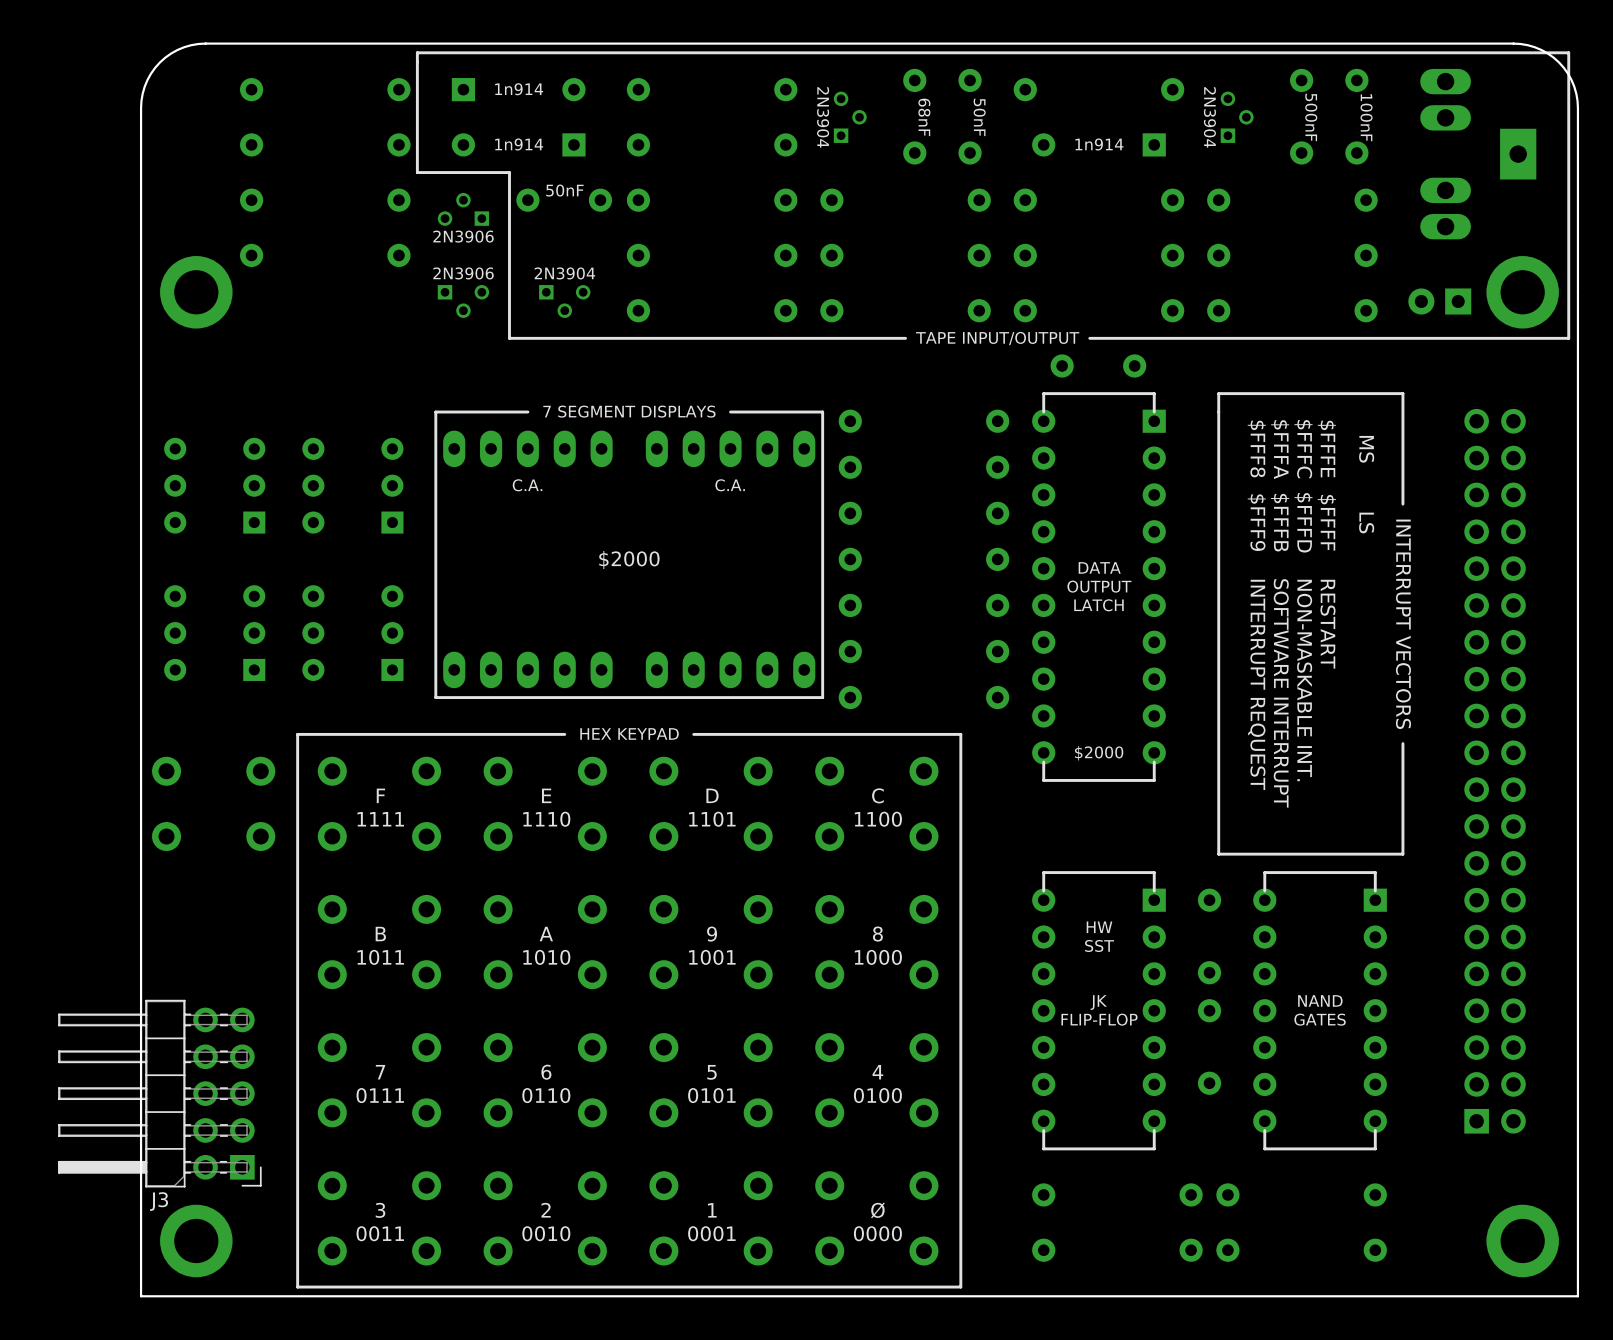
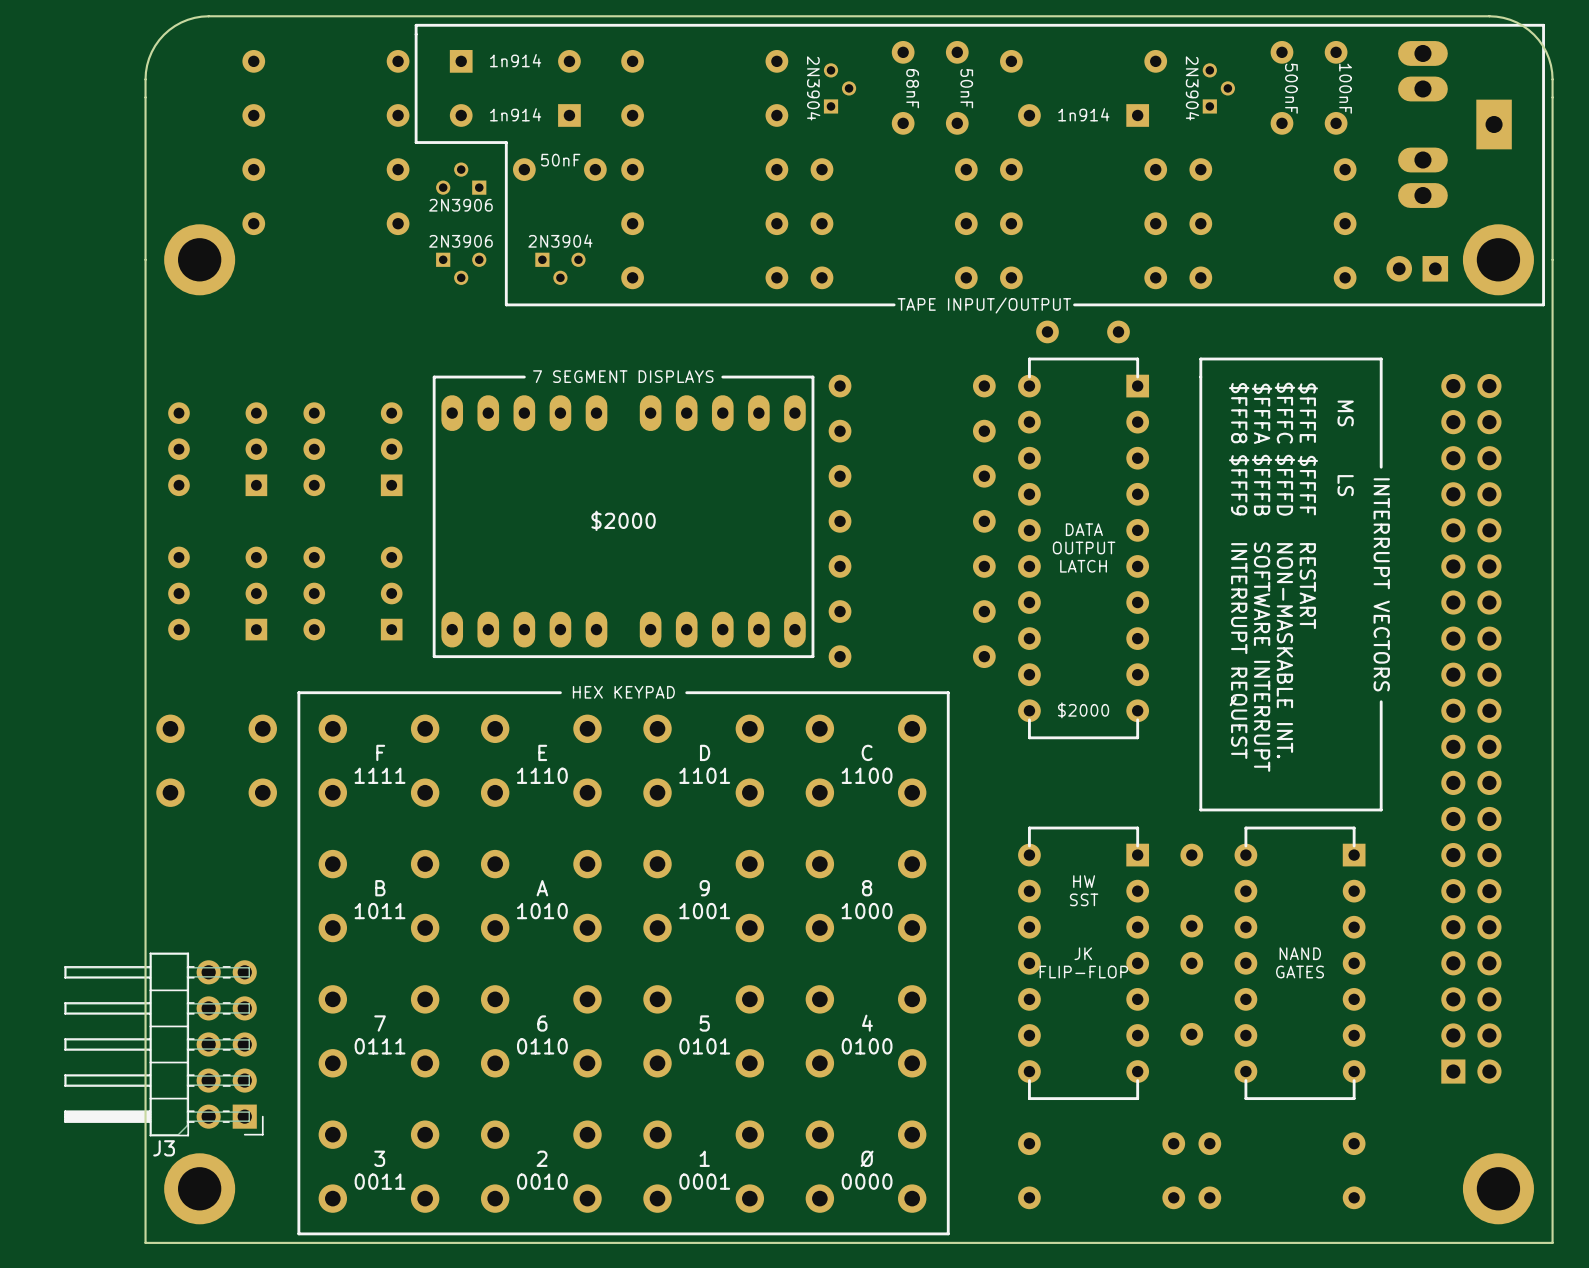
text: C.A. (527, 485) -> none
text: C.A. (730, 485) -> none

